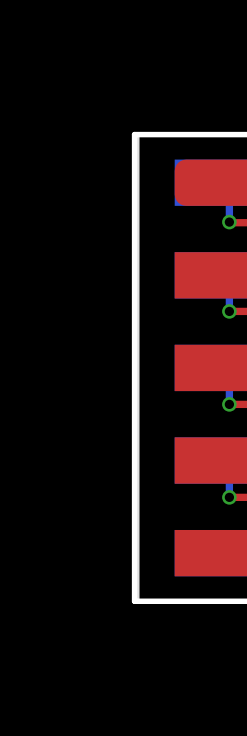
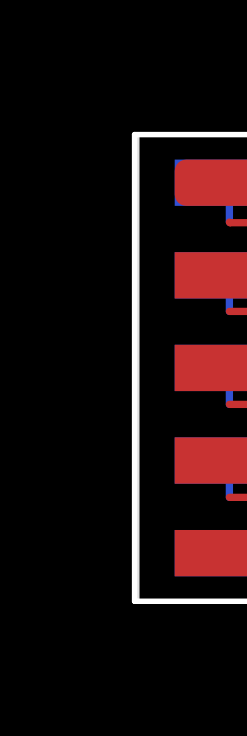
via: (229, 222) -> none
via: (229, 311) -> none
via: (229, 404) -> none
via: (229, 497) -> none

